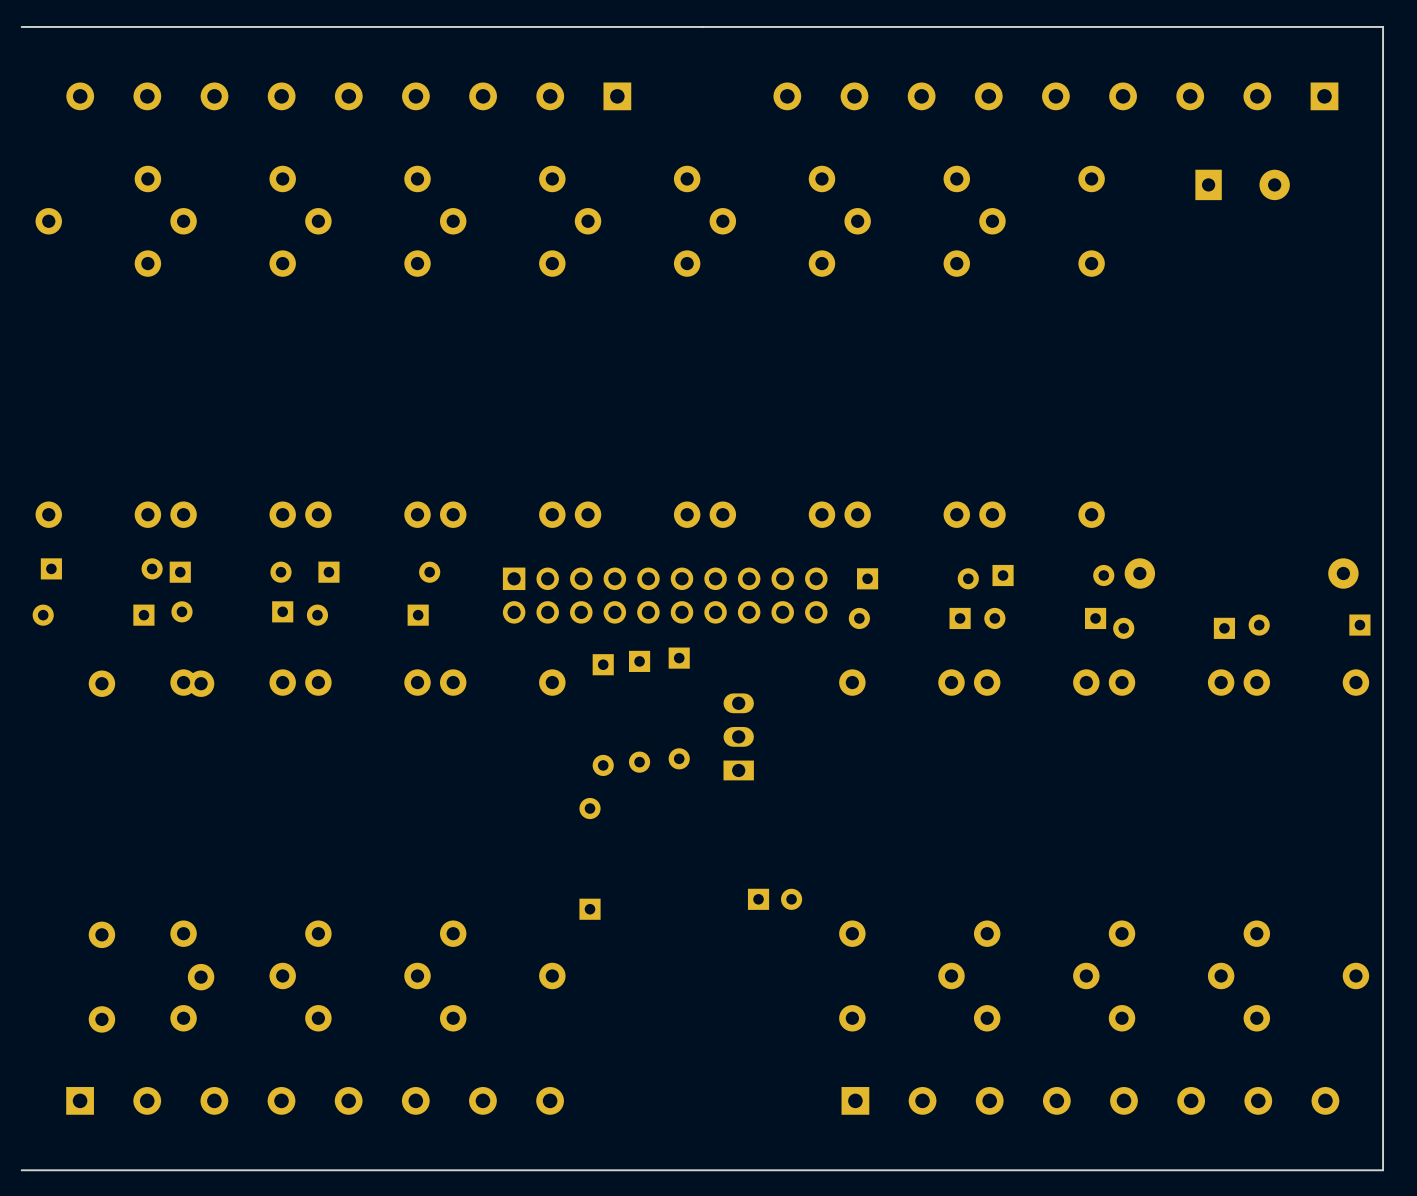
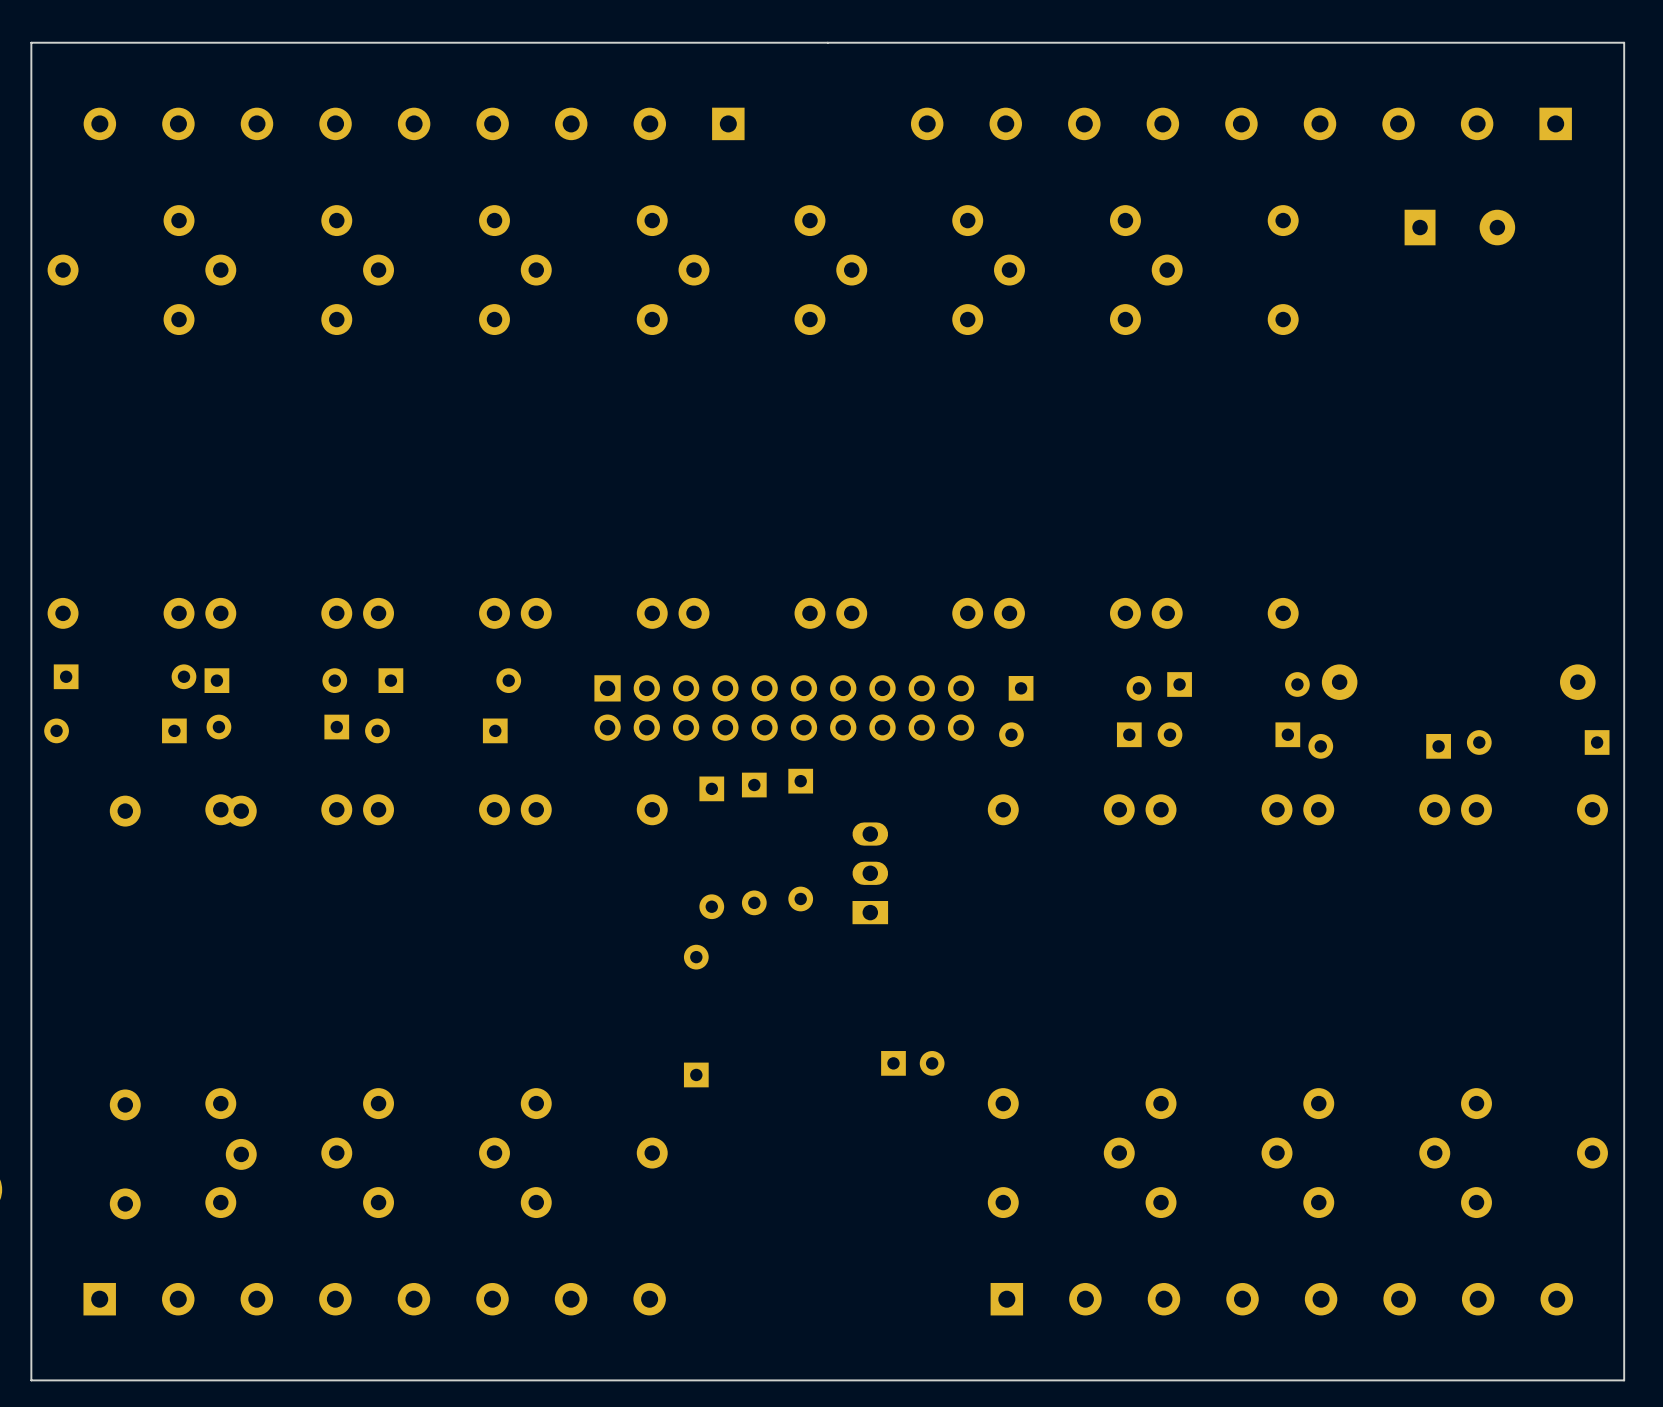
board edge: none -> (31, 42) (31, 1380)

